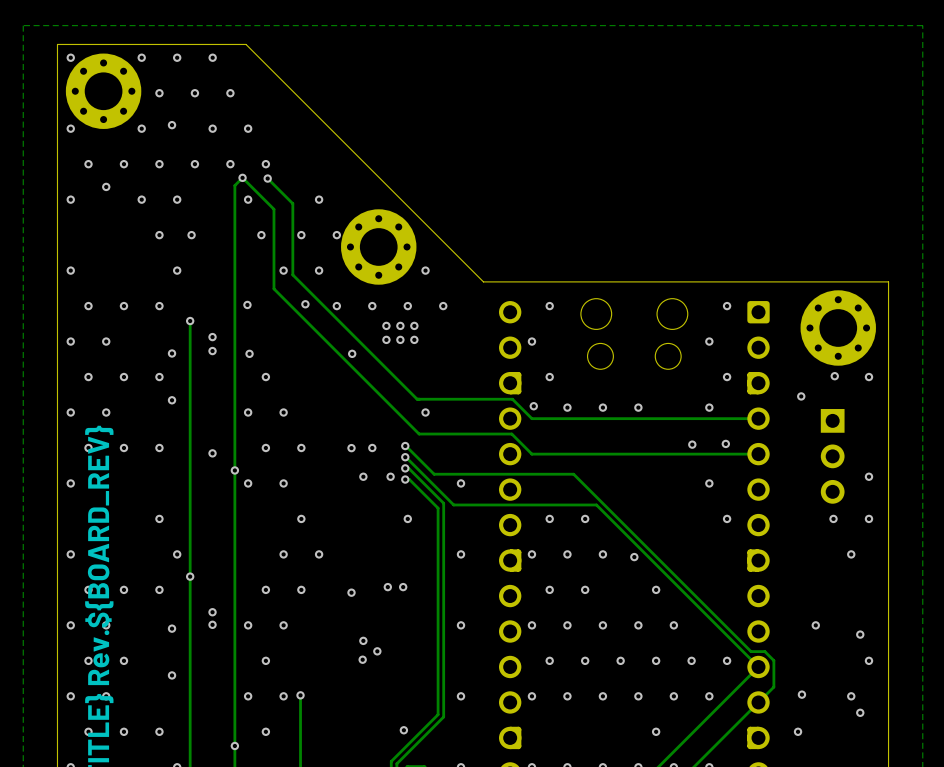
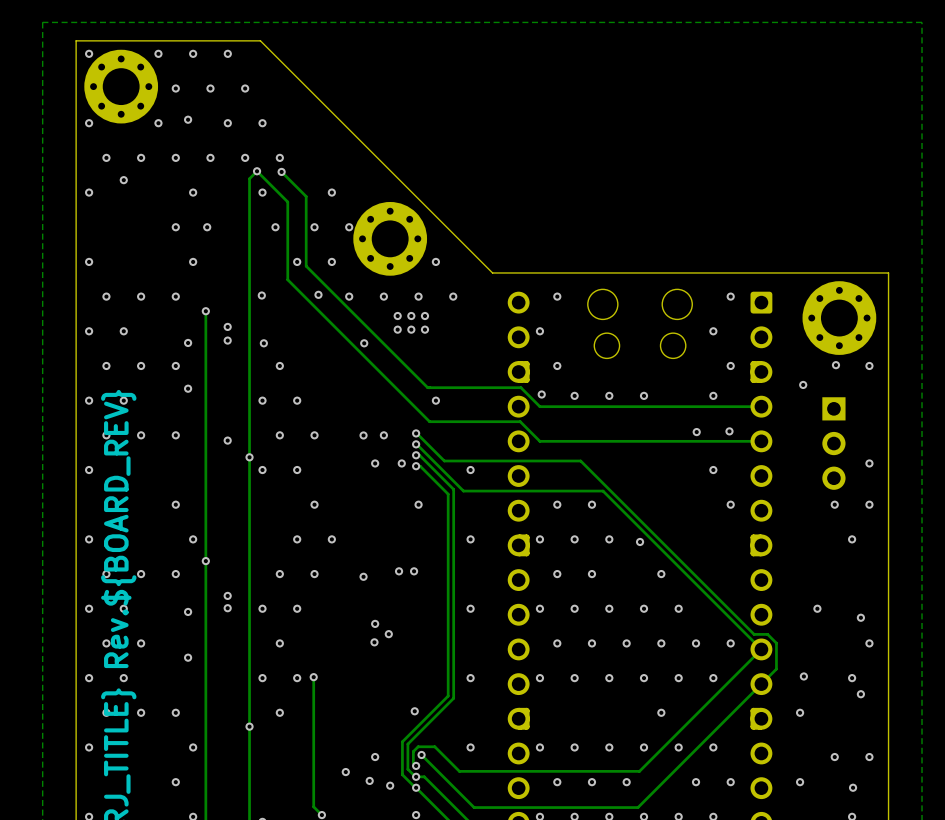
via: (141, 199) -> none

